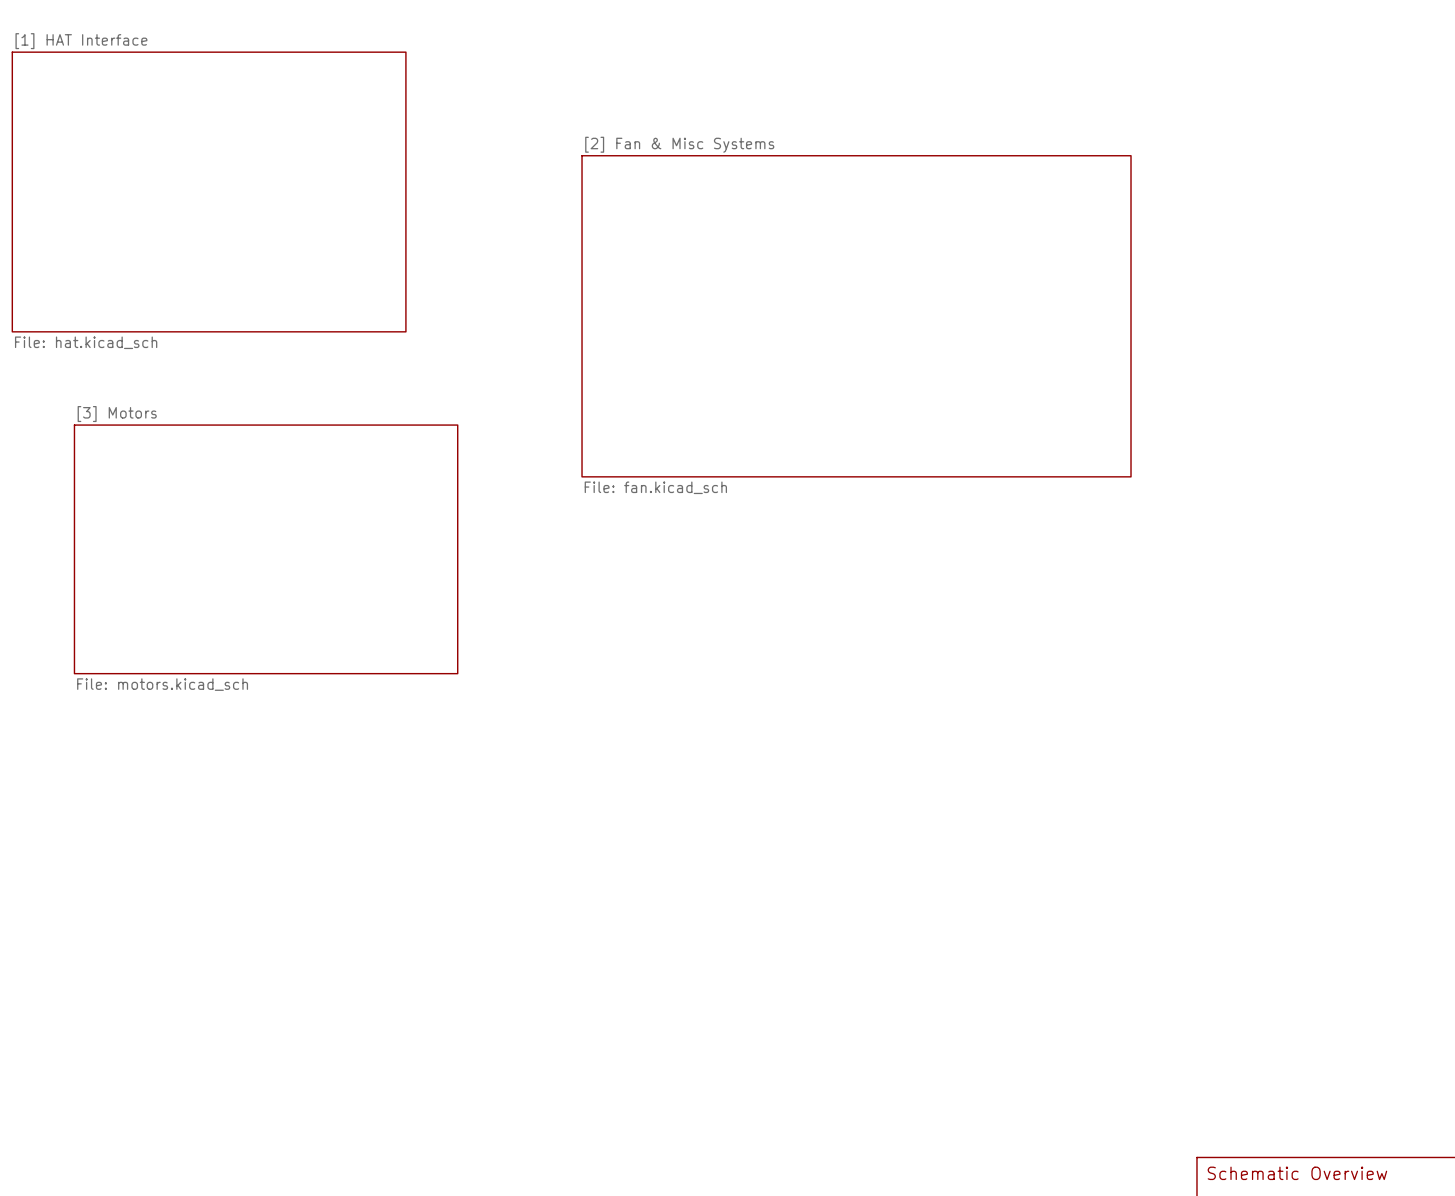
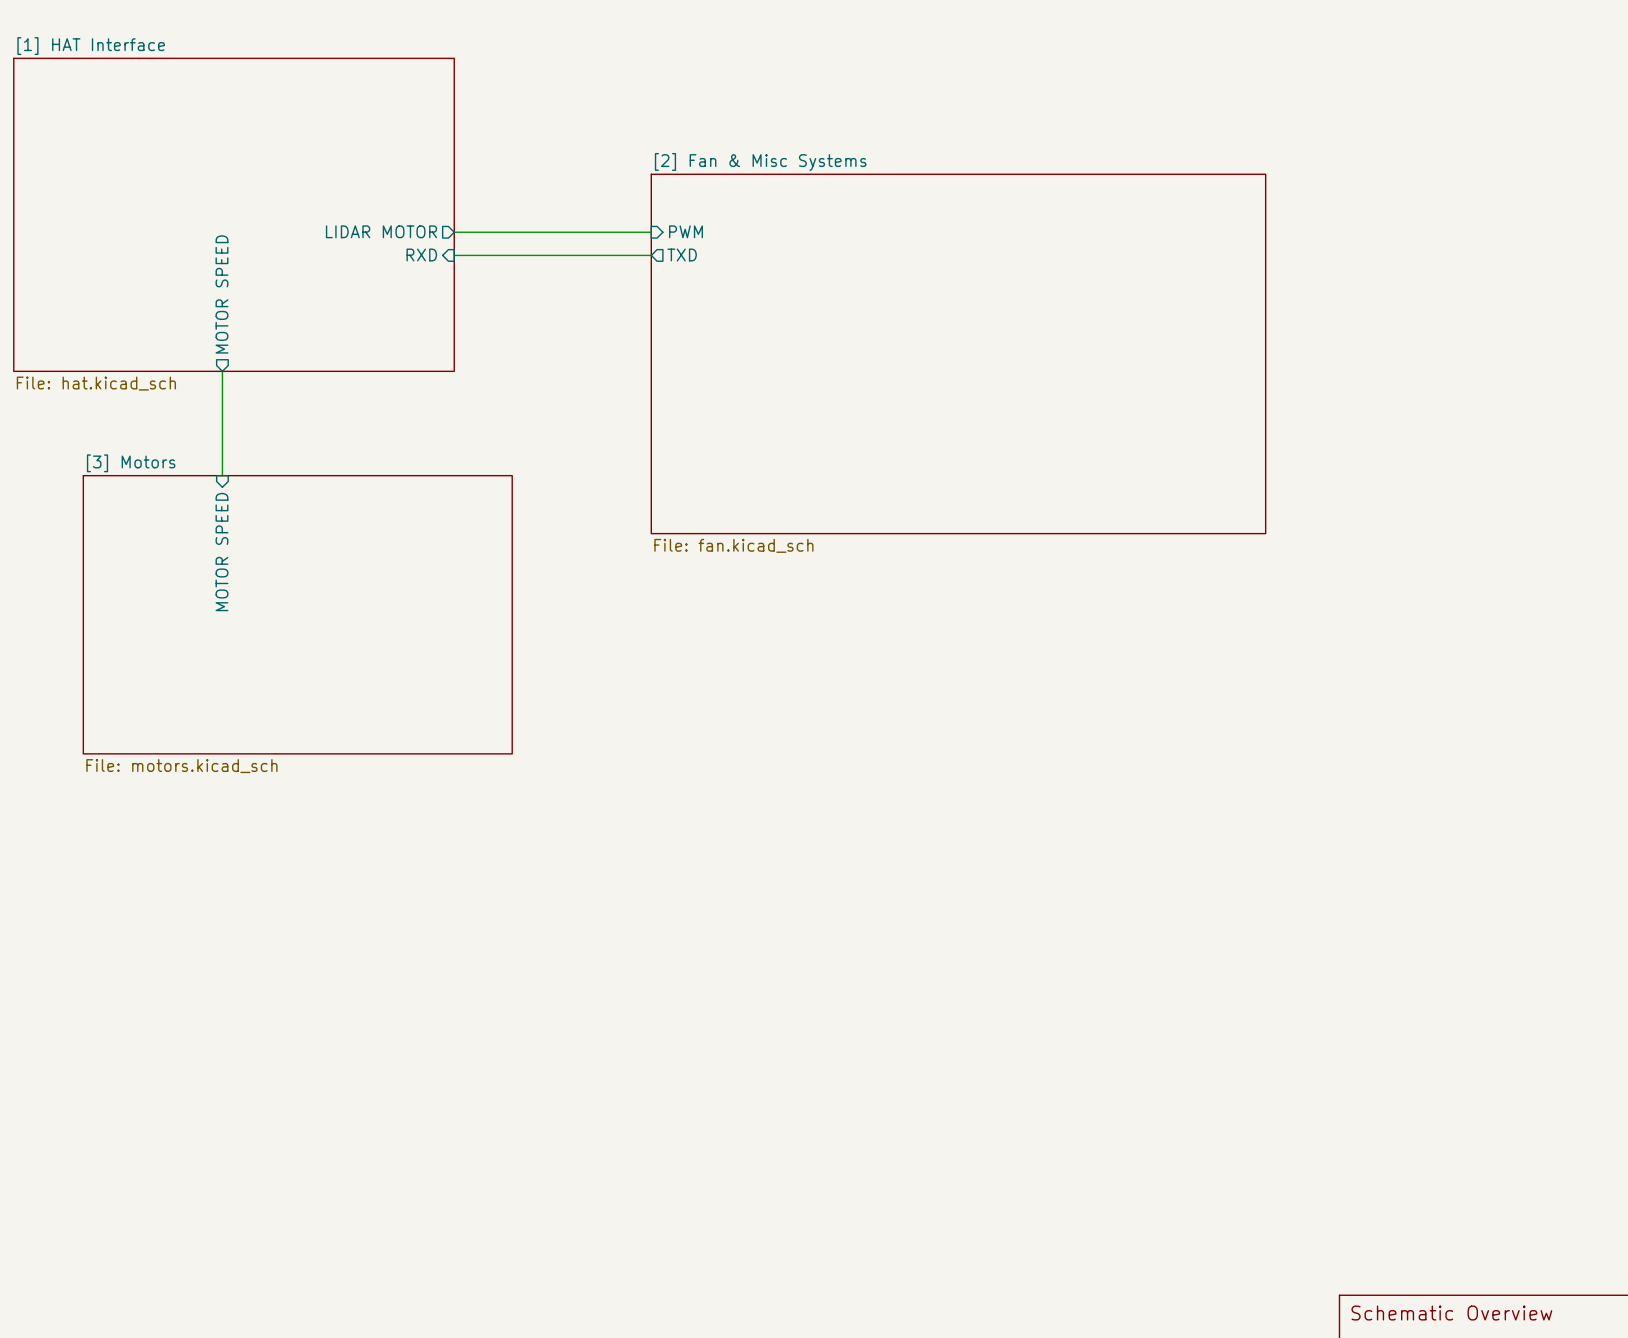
sheet pin: none -> LIDAR MOTOR (381, 231)
wire: none -> (454, 232) (651, 232)
sheet pin: none -> PWM (685, 231)
sheet pin: none -> RXD (421, 254)
sheet pin: none -> TXD (682, 254)
wire: none -> (454, 255) (651, 255)
sheet pin: none -> MOTOR SPEED (221, 294)
wire: none -> (222, 371) (222, 475)
sheet pin: none -> MOTOR SPEED (221, 552)

